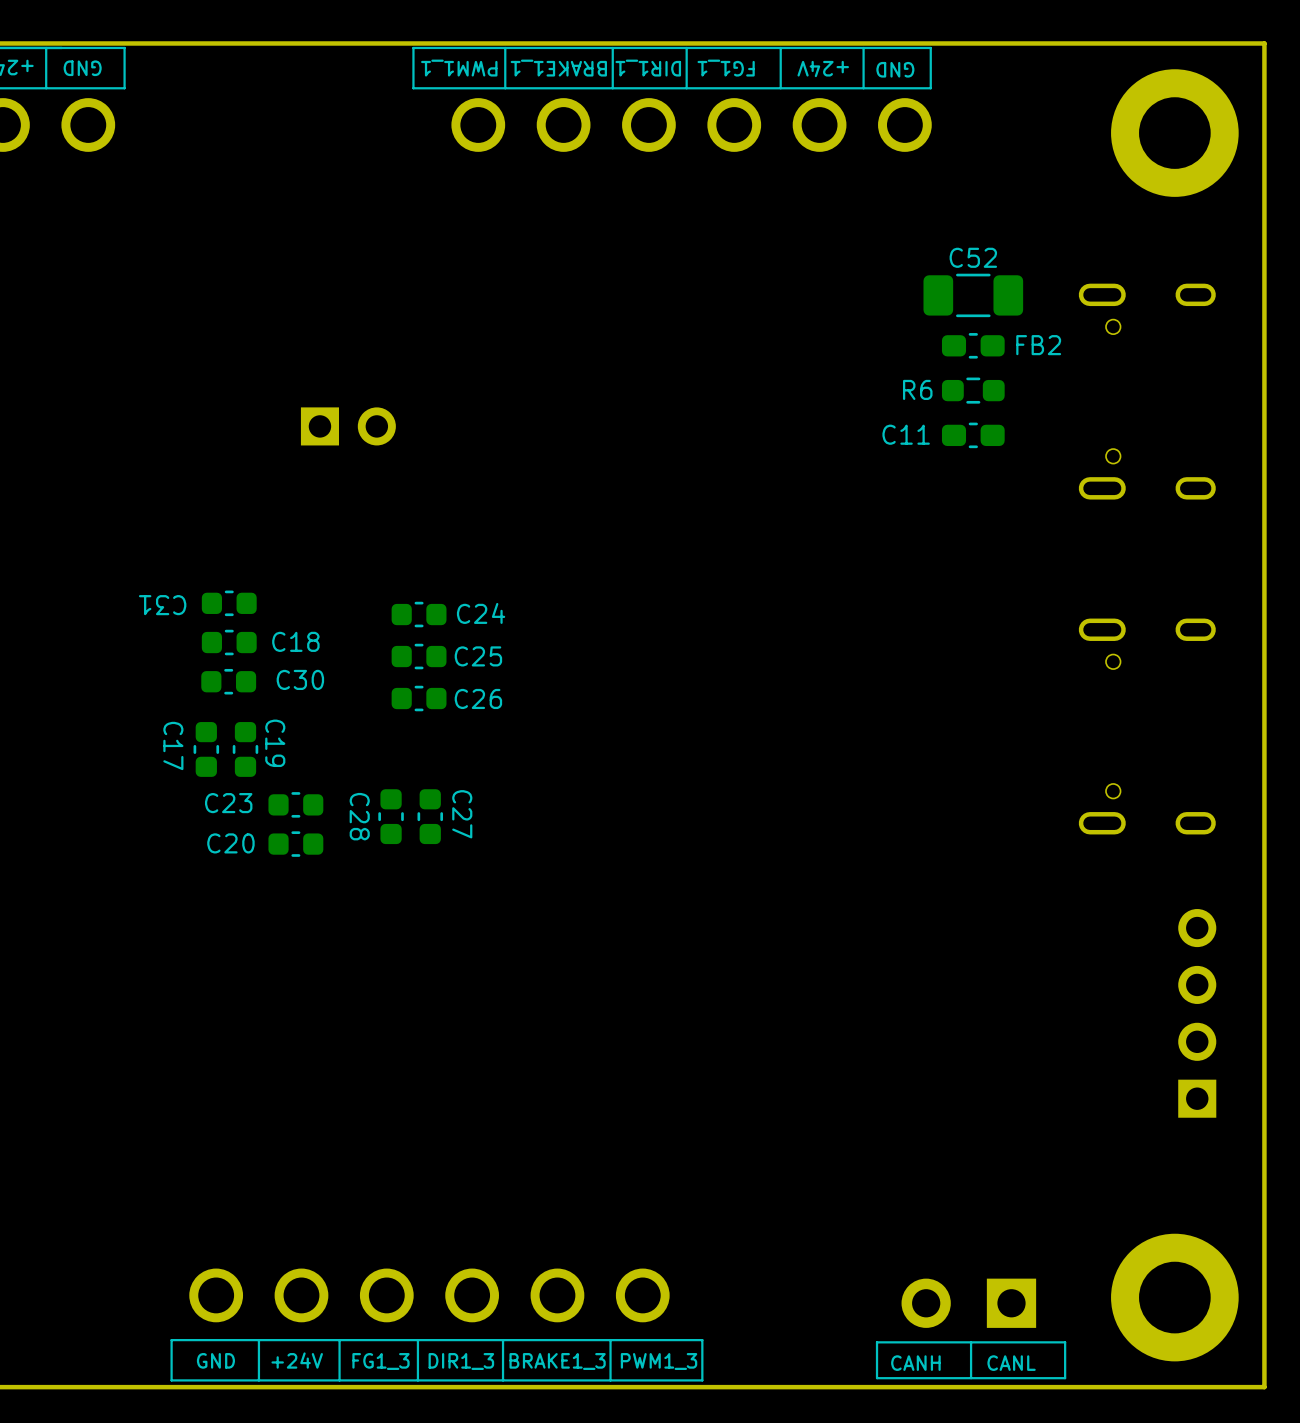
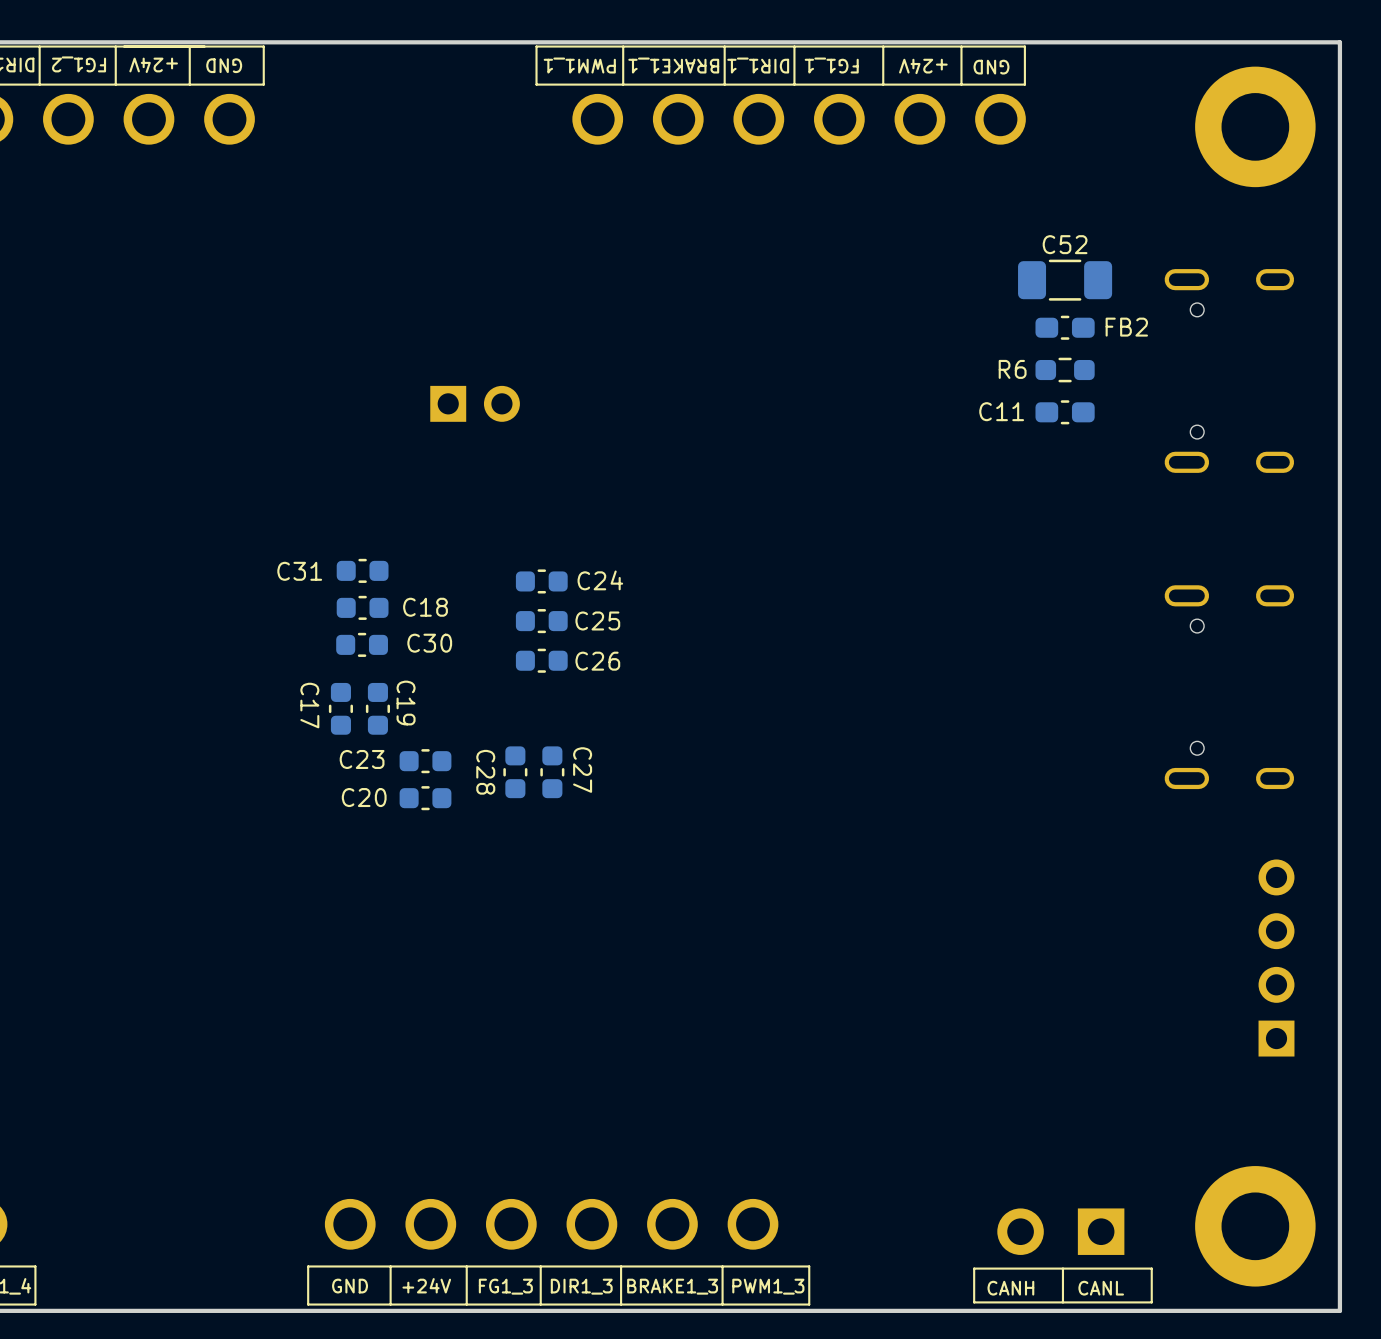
C31 name rotation: 0° (162, 605) -> 180° (299, 571)

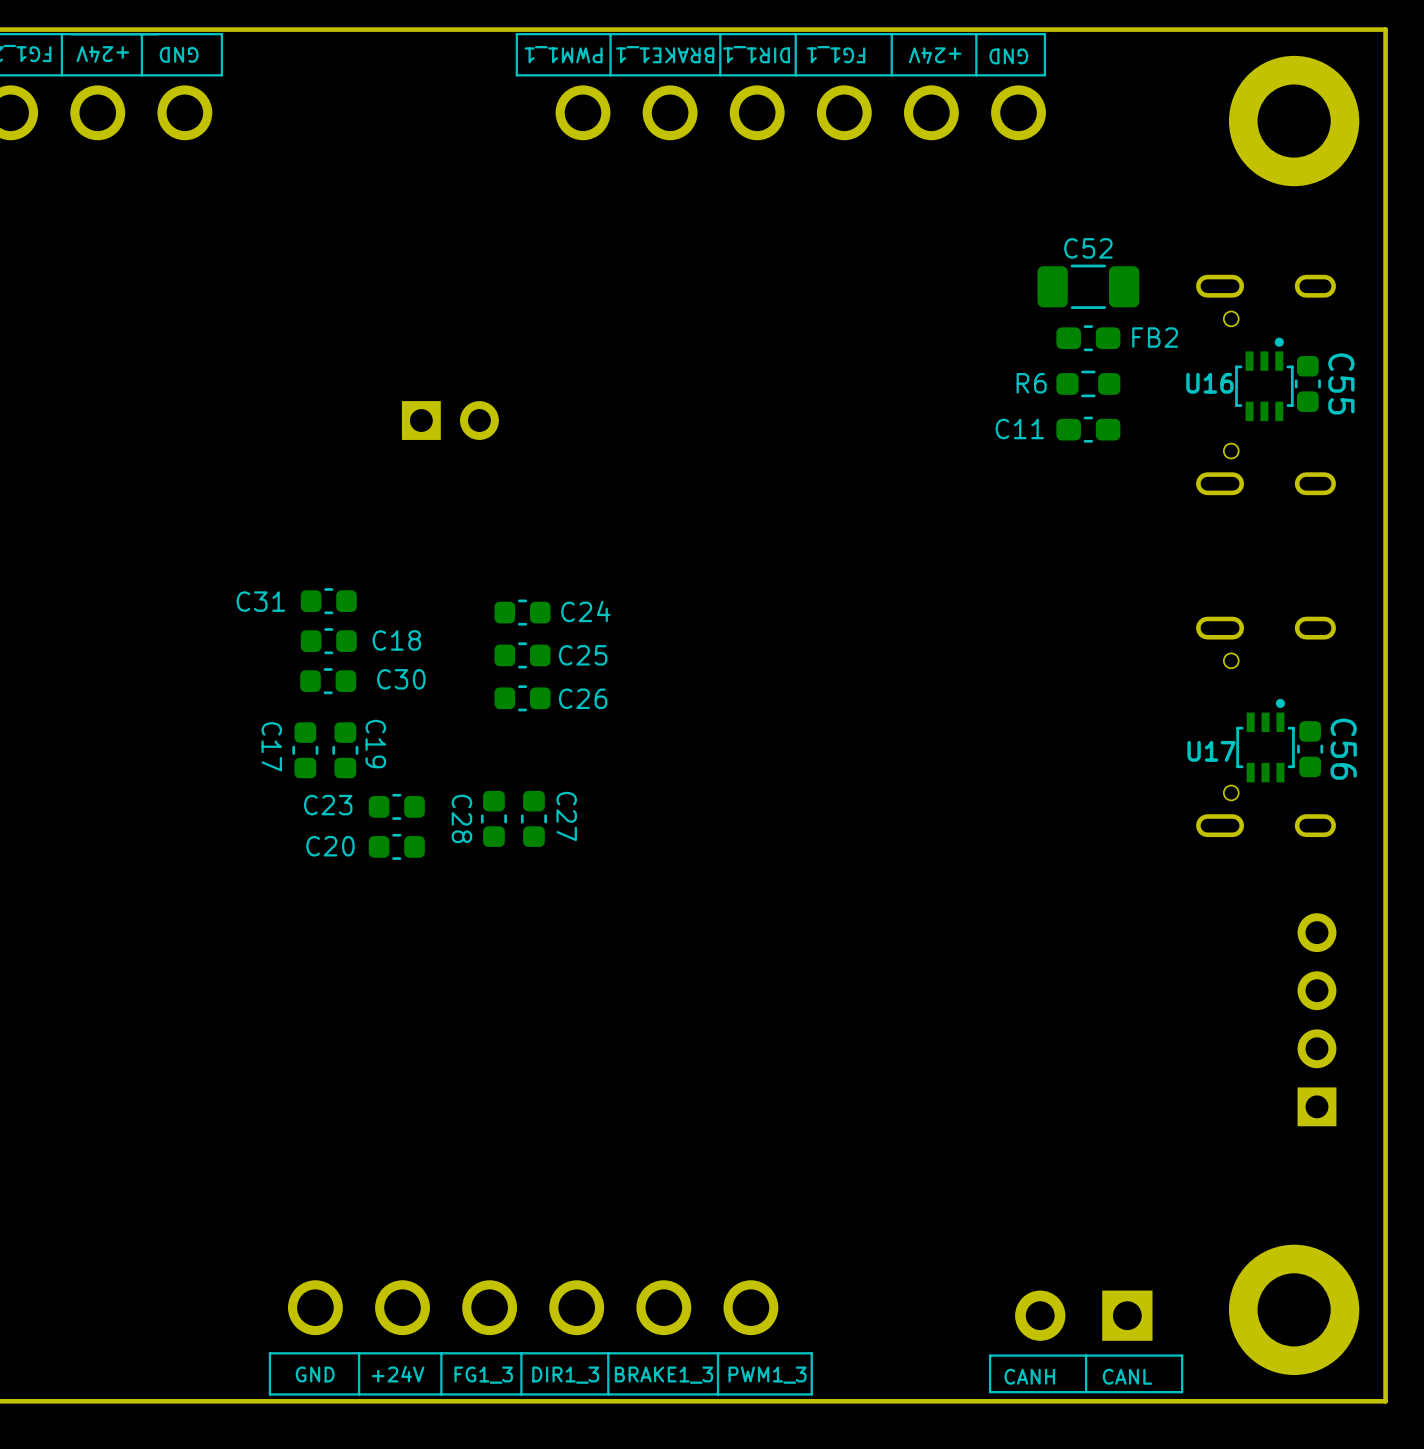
U16: none -> (1264, 379)
C55: none -> (1307, 383)
U17: none -> (1265, 740)
C56: none -> (1310, 749)

